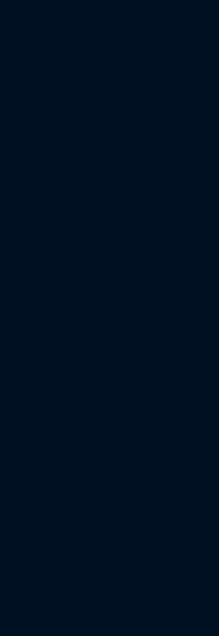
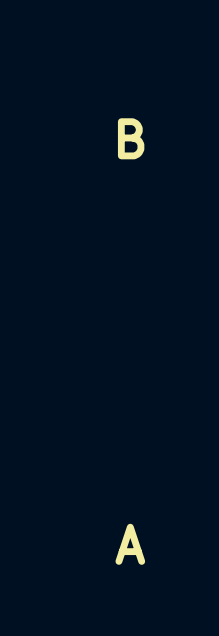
text: none -> B (131, 138)
text: none -> A (130, 544)

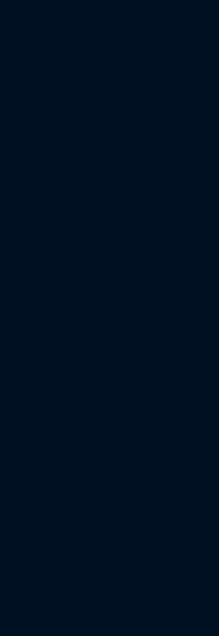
text: B (131, 138) -> none
text: A (130, 544) -> none

